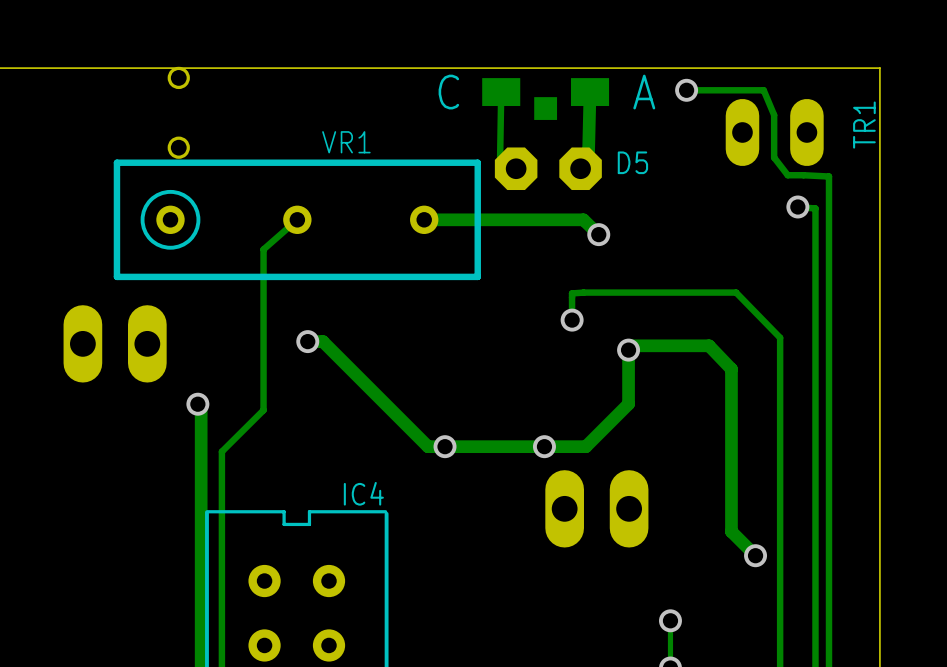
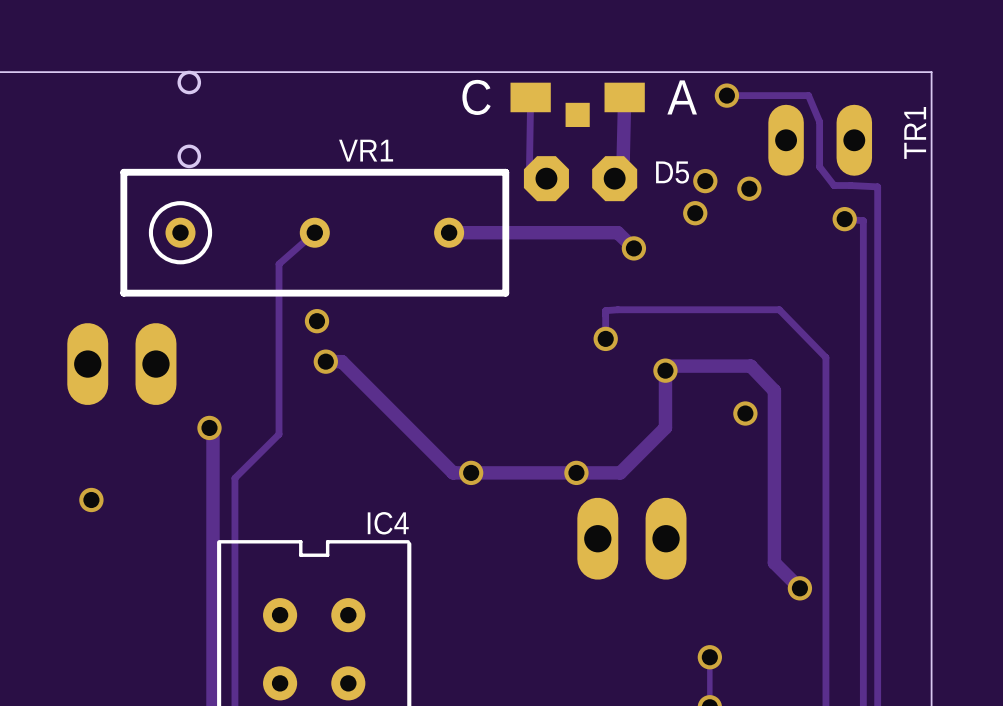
via: none -> (705, 181)
via: none -> (749, 188)
via: none -> (695, 213)
via: none -> (317, 321)
via: none -> (745, 413)
via: none -> (91, 500)

